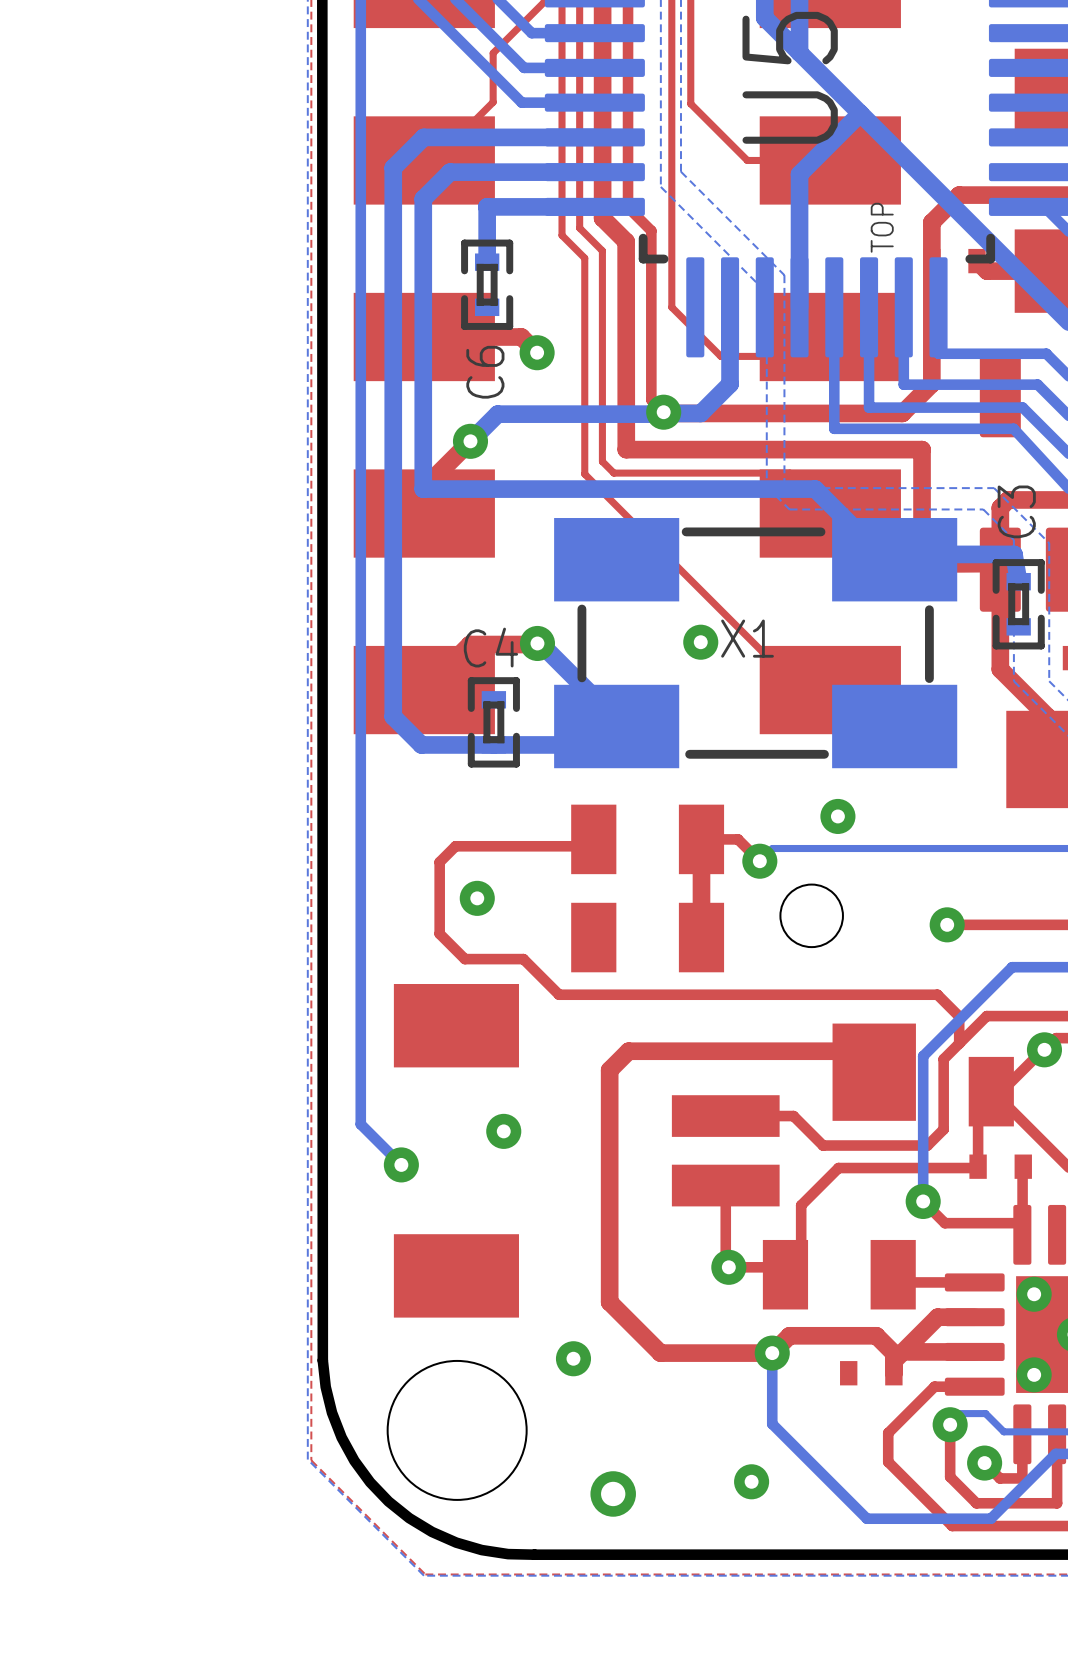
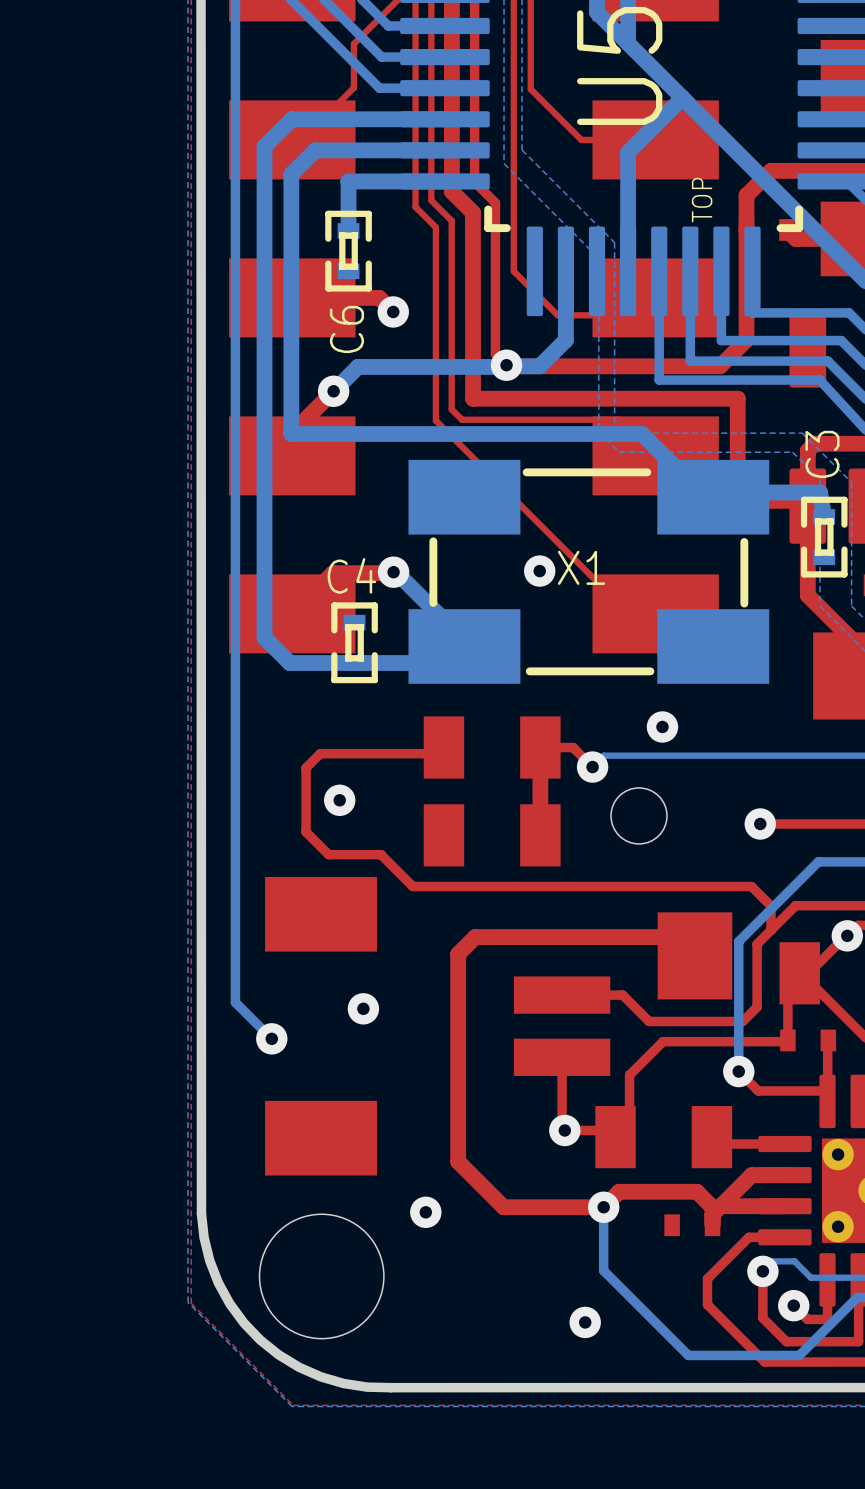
via: (613, 1493) -> none

